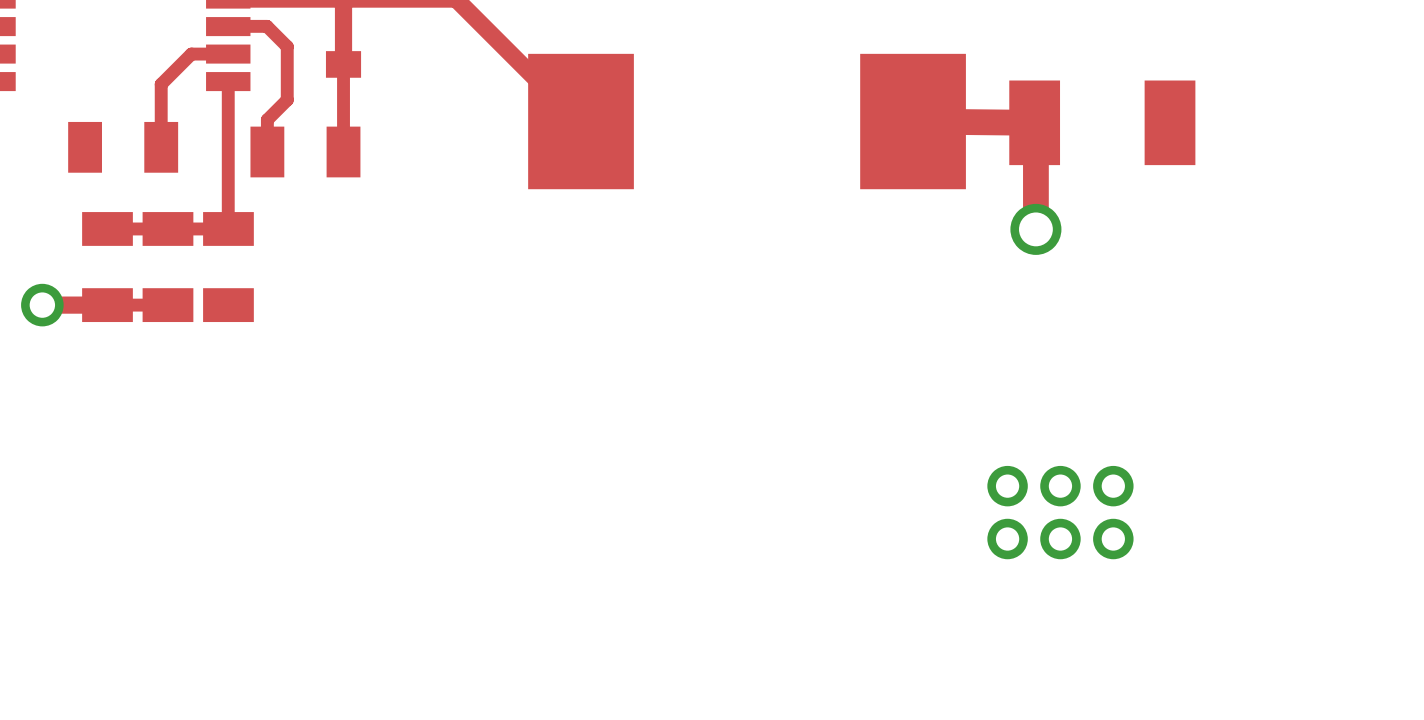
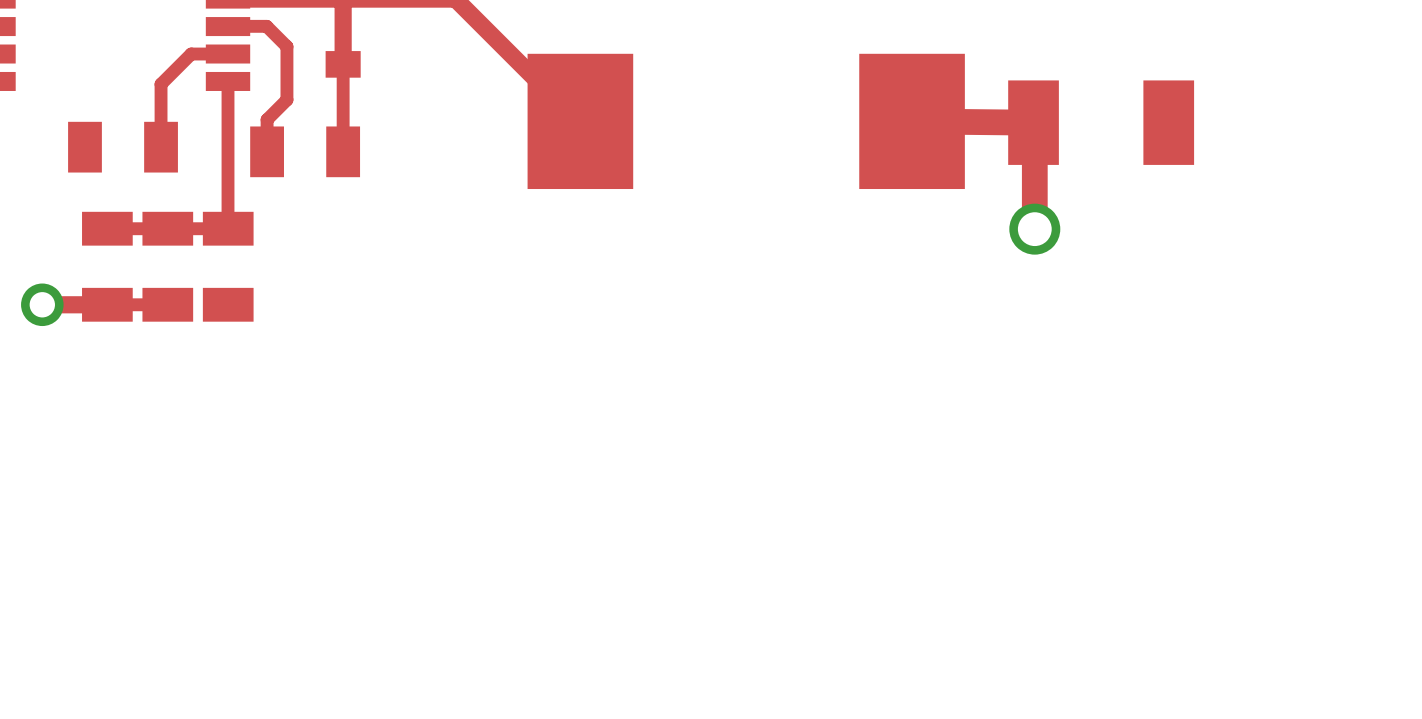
part: (1060, 512) -> none

